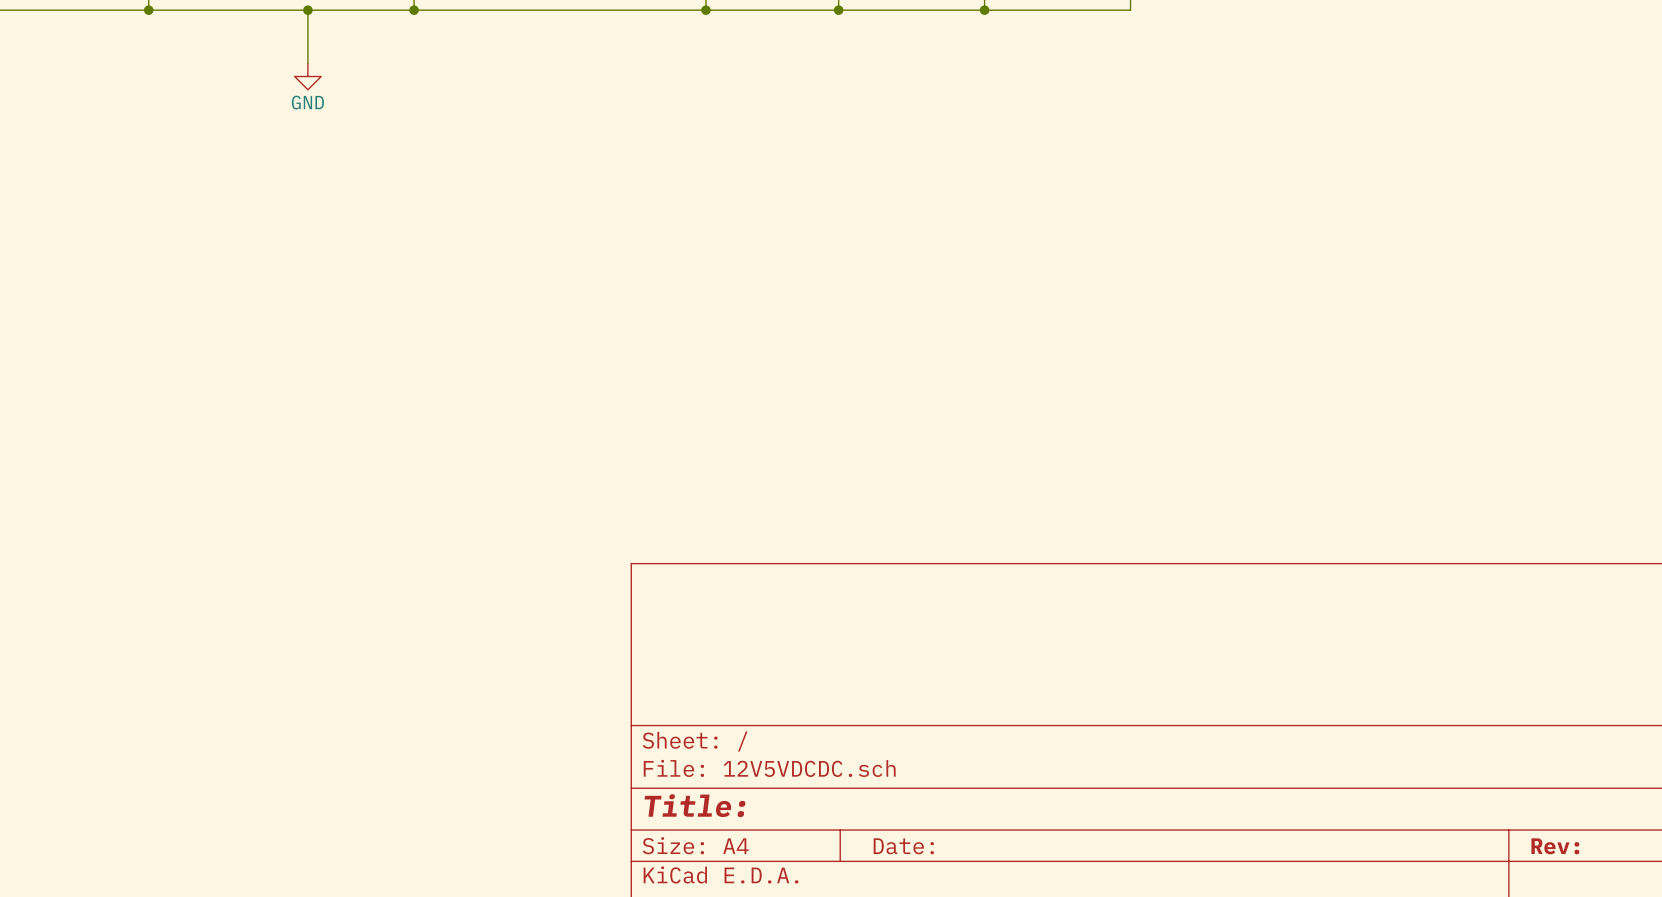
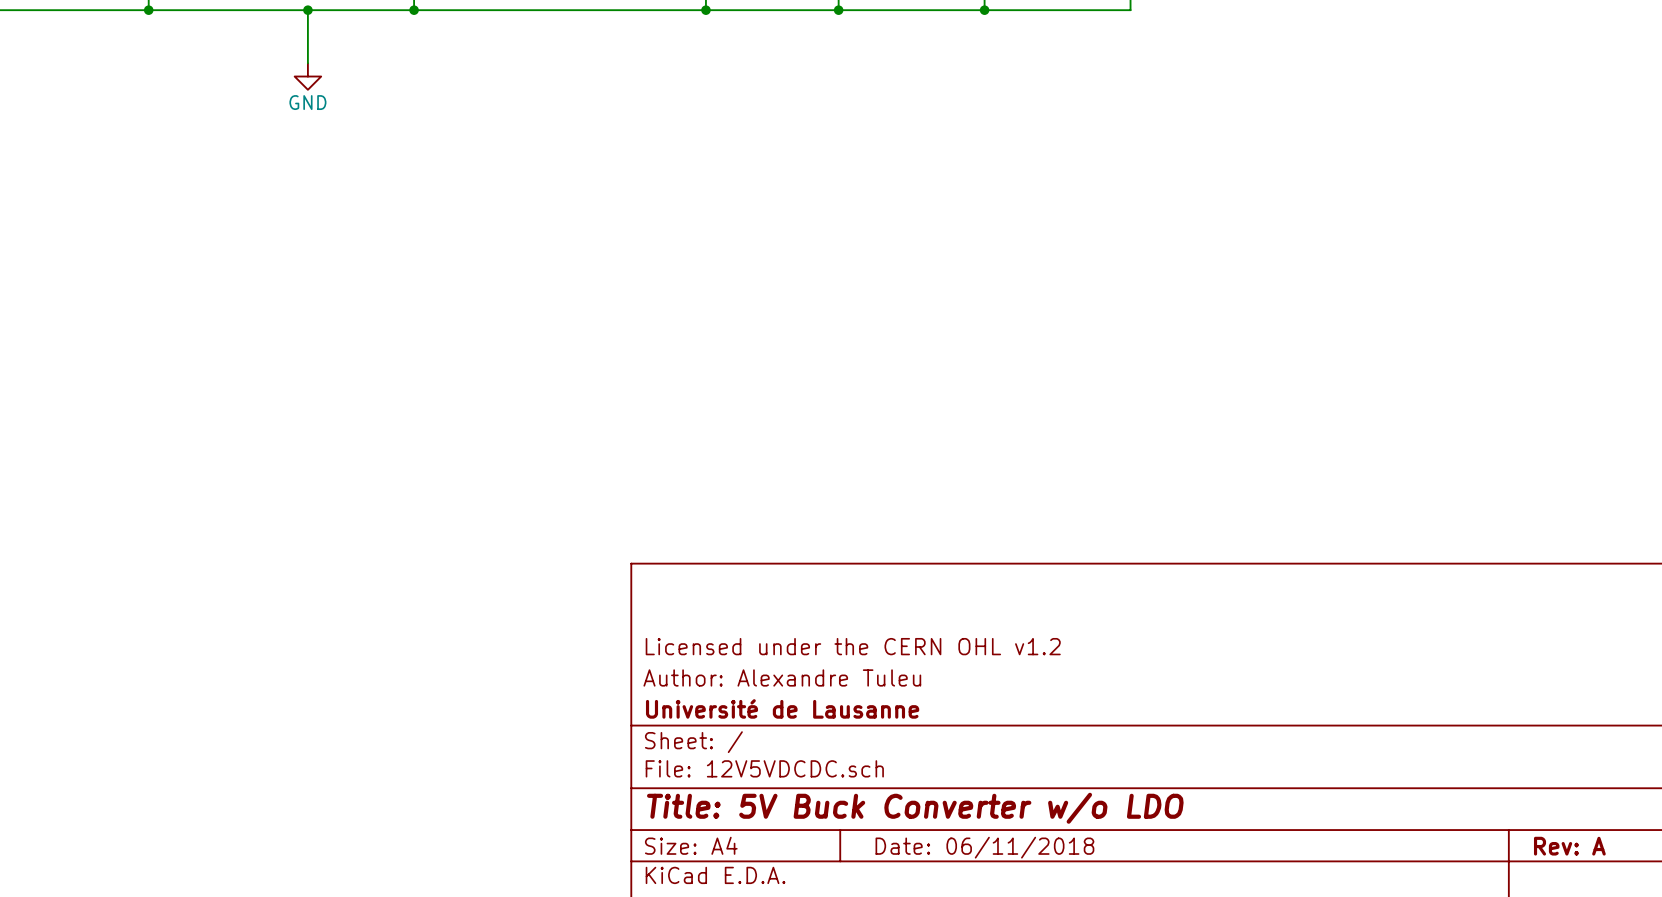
title block: none -> Licensed under the CERN OHL v1.2 (853, 646)
title block: none -> Author: Alexandre Tuleu (782, 677)
title block: none -> Université de Lausanne (782, 708)
title block: Title: (695, 805) -> Title: 5V Buck Converter w/o LDO (915, 808)
title block: Date: (903, 846) -> Date: 06/11/2018 (984, 847)
title block: Rev: (1555, 846) -> Rev: A (1569, 846)

